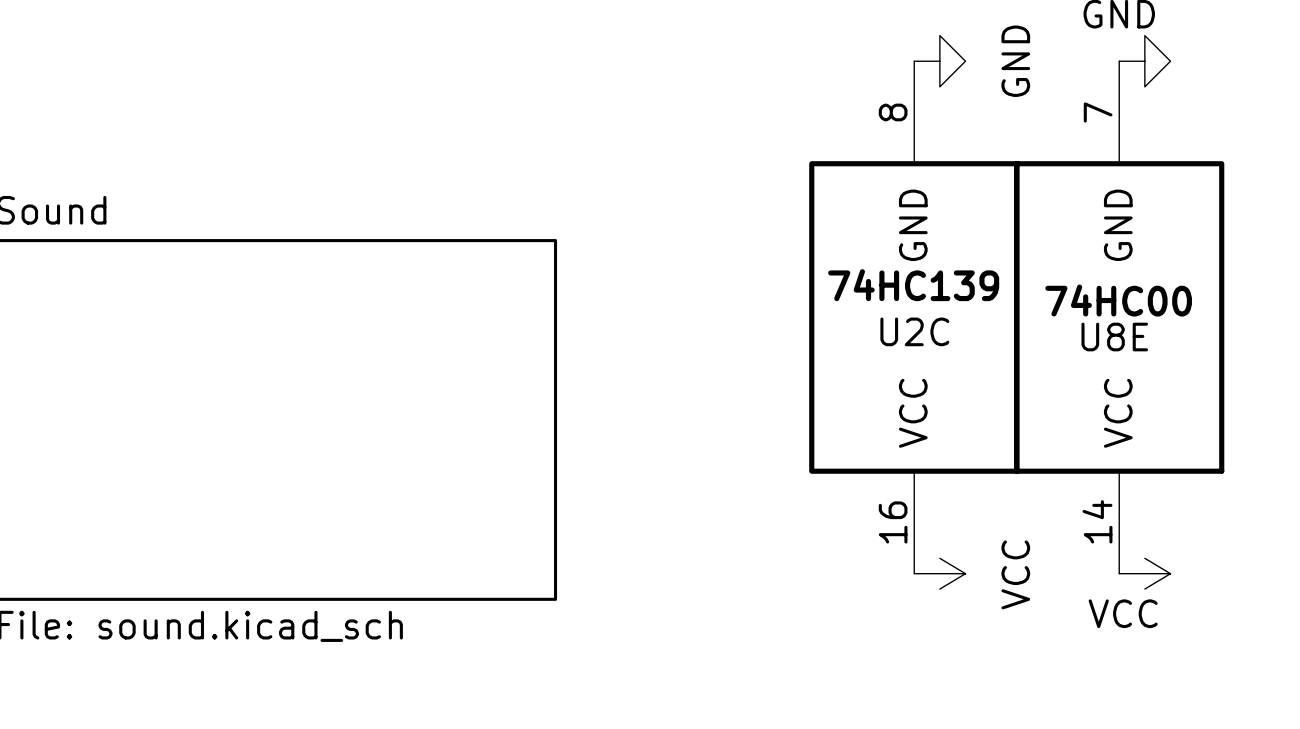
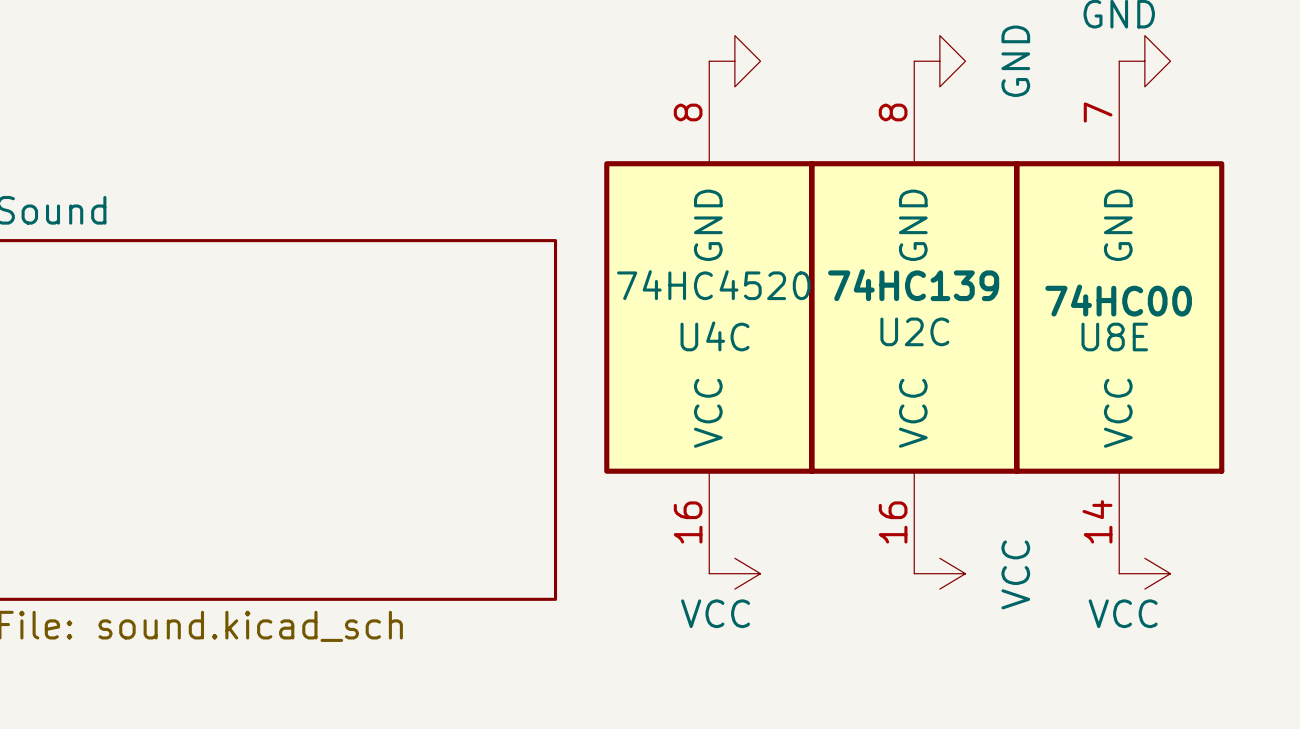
power symbol: none -> (734, 61)
U4C: none -> 74HC4520 (709, 317)
power symbol: none -> VCC (734, 573)

